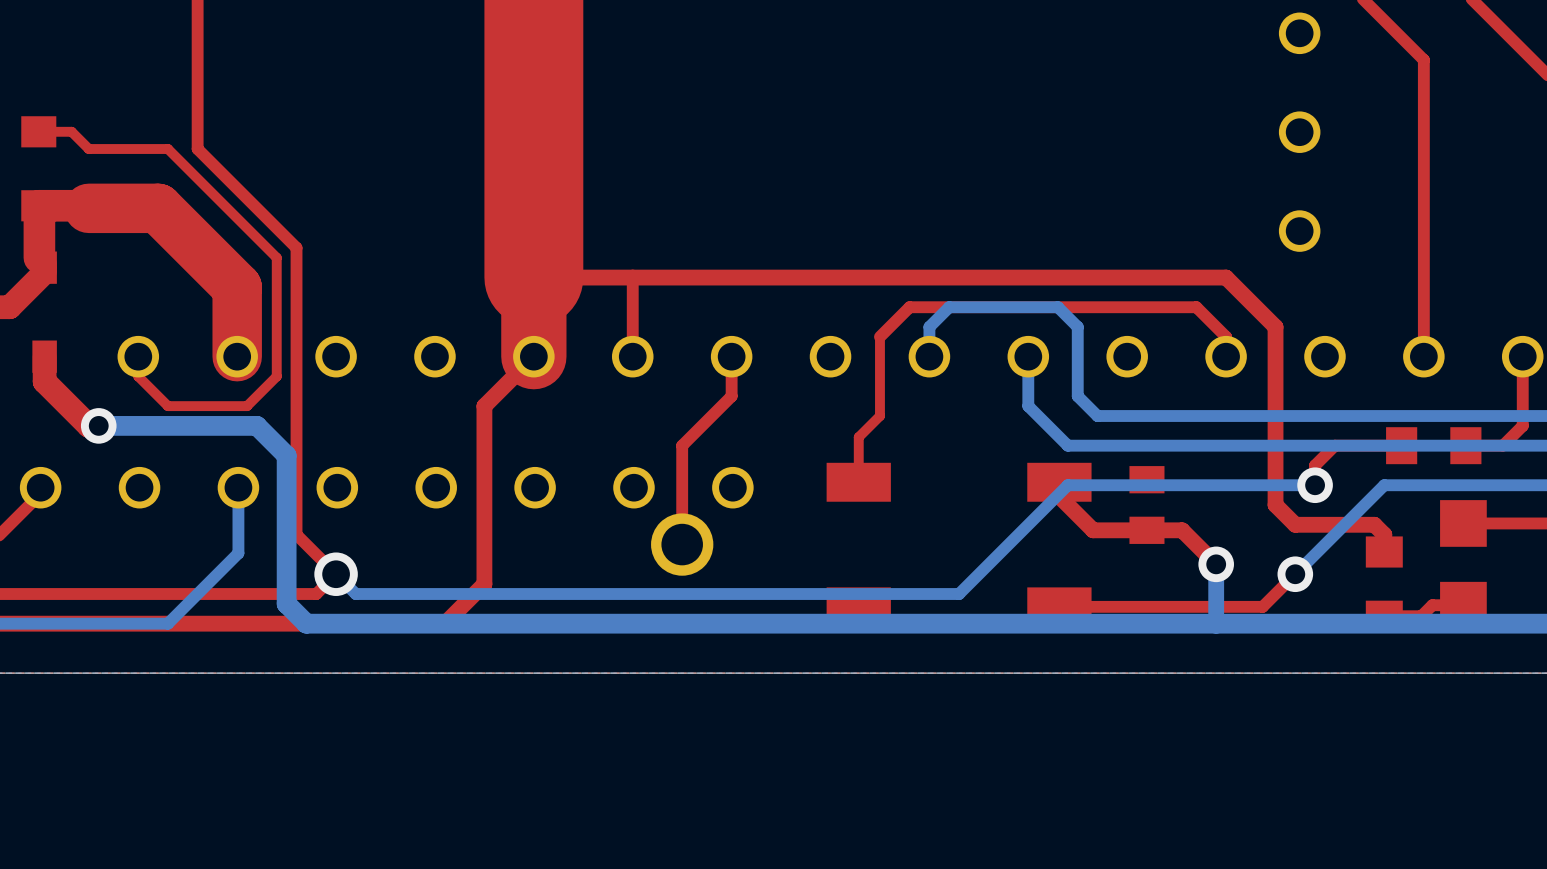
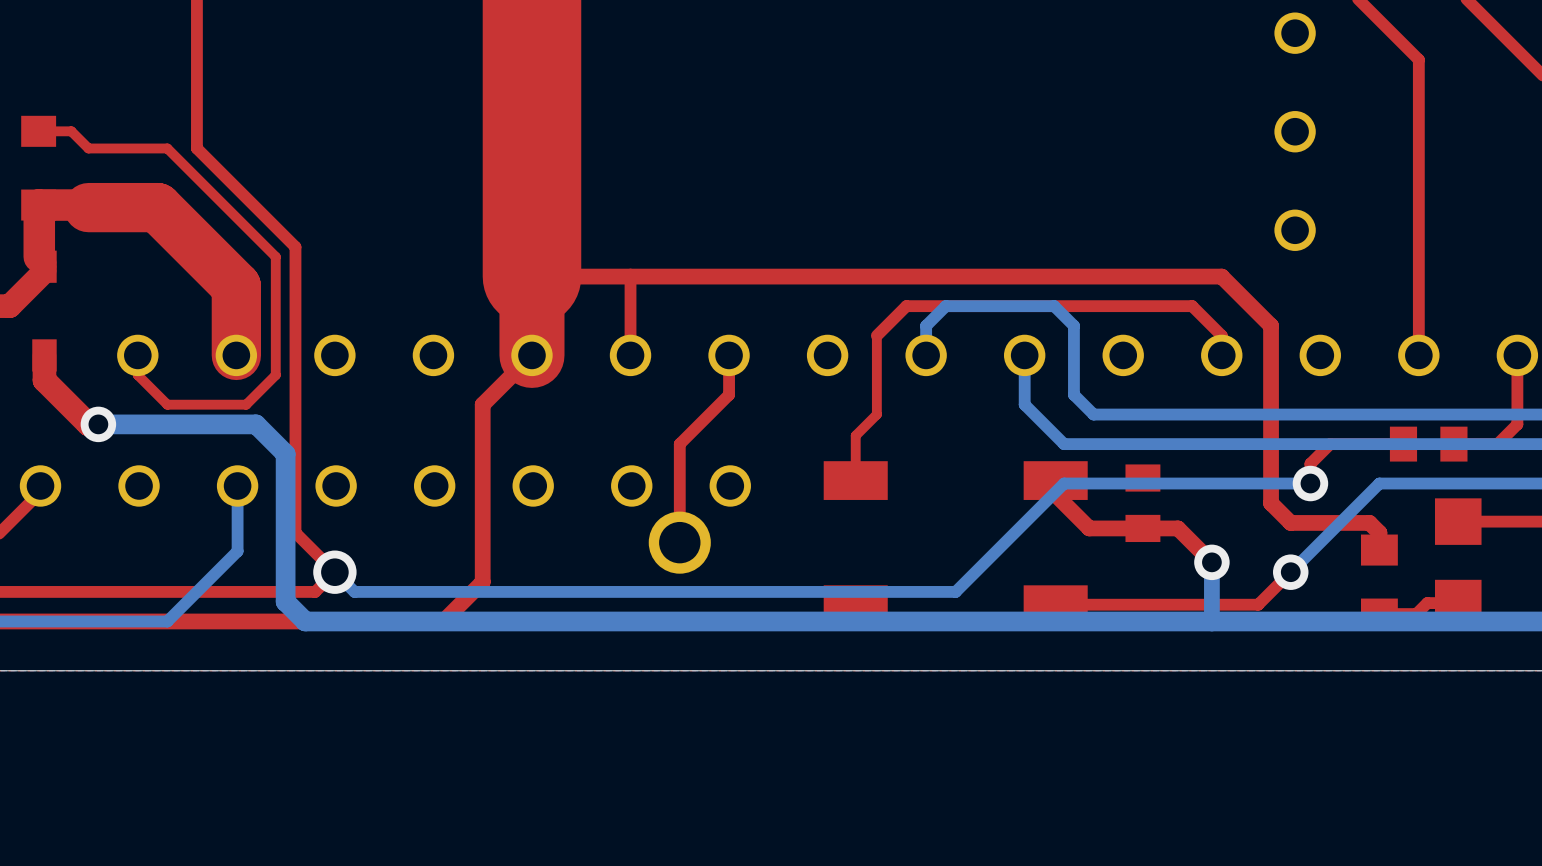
part footprint: [1386, 427, 1482, 465] -> [1389, 426, 1468, 462]

